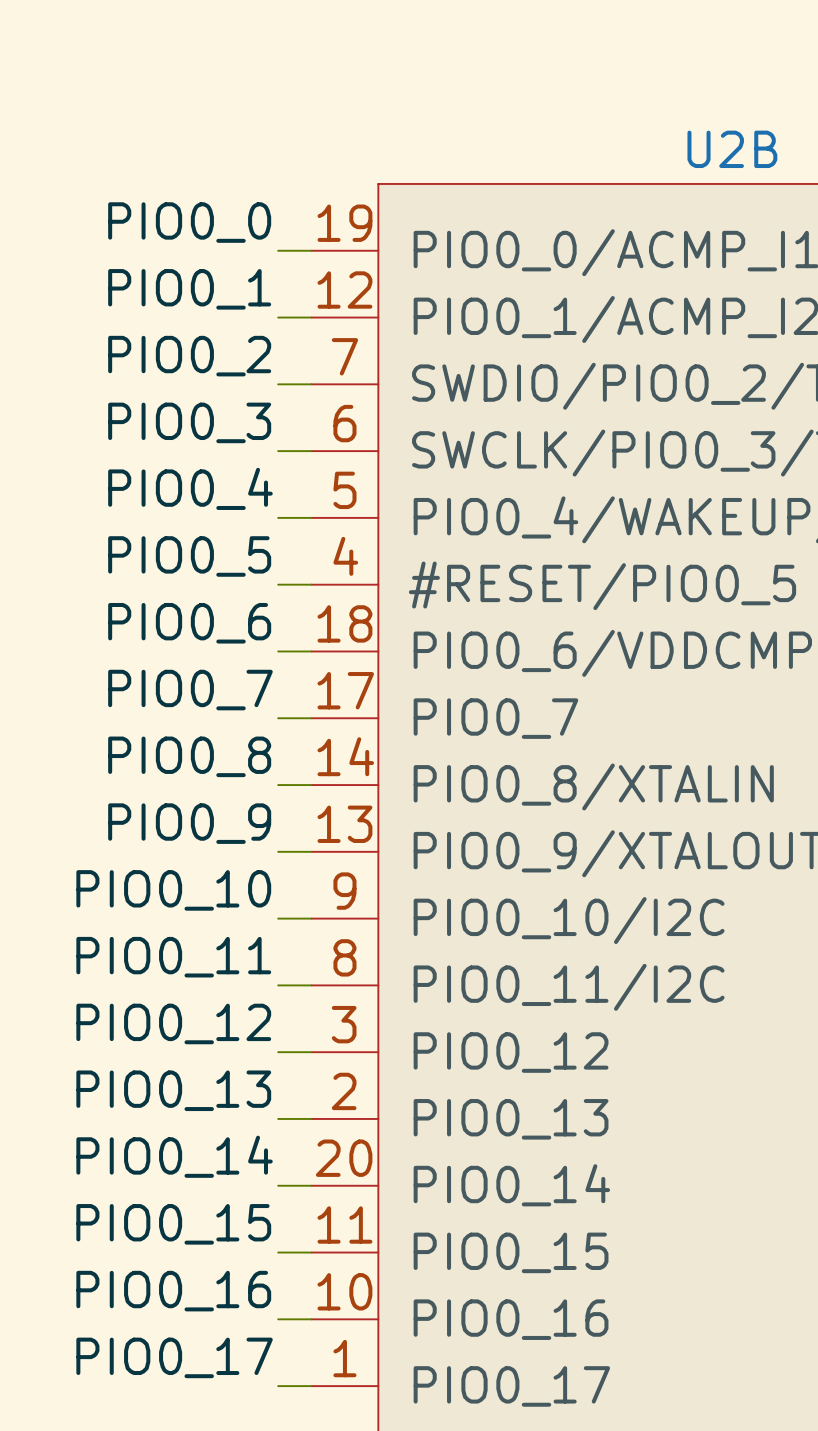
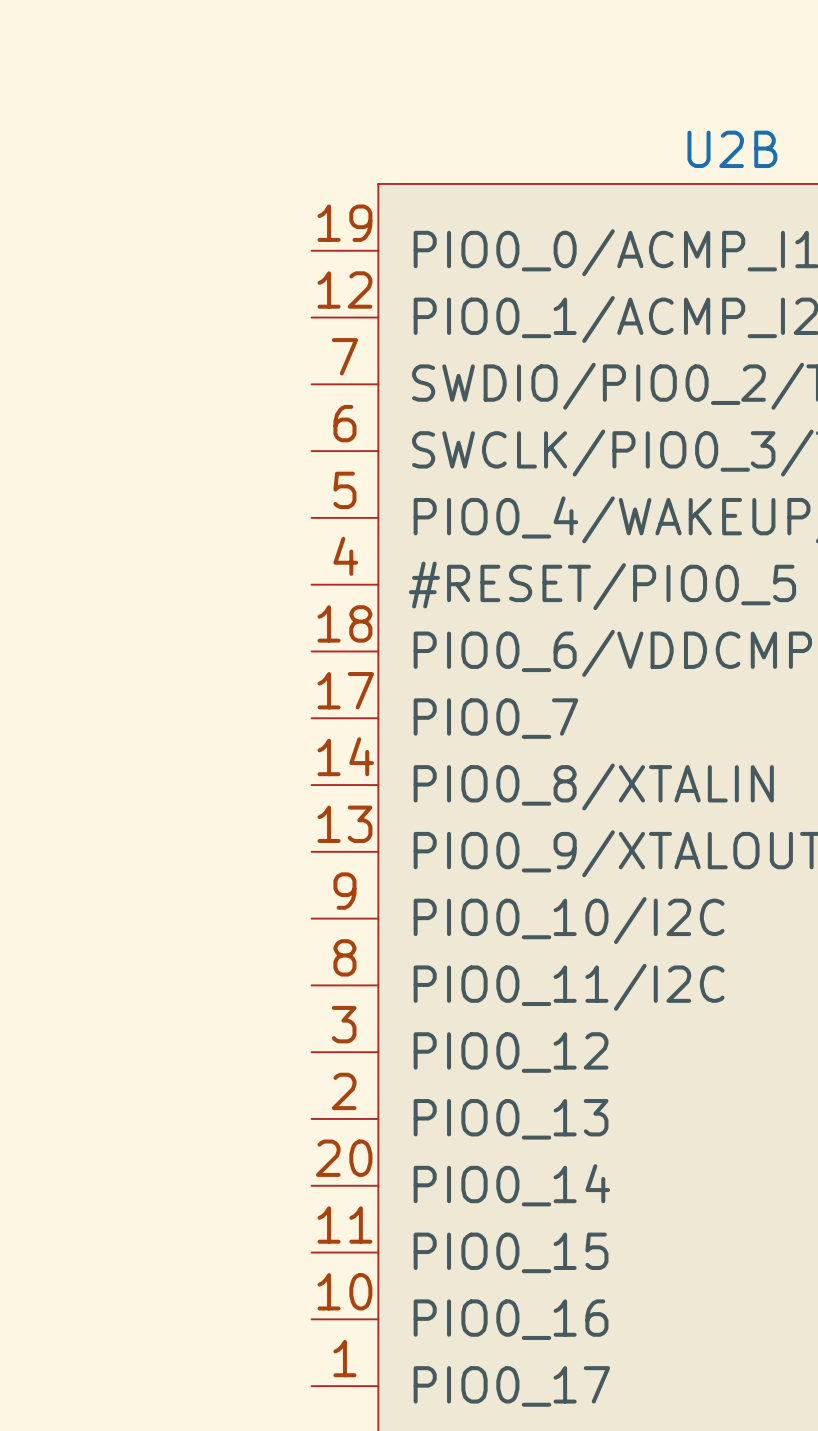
label: PIO0_0 (189, 222) -> none
wire: (278, 250) (311, 250) -> none
label: PIO0_1 (189, 289) -> none
wire: (278, 317) (311, 317) -> none
label: PIO0_2 (189, 356) -> none
wire: (278, 384) (311, 384) -> none
label: PIO0_3 (189, 422) -> none
wire: (278, 451) (311, 451) -> none
label: PIO0_4 (190, 488) -> none
wire: (278, 517) (311, 517) -> none
label: PIO0_5 (189, 556) -> none
wire: (278, 584) (311, 584) -> none
label: PIO0_6 (189, 623) -> none
wire: (278, 651) (311, 651) -> none
label: PIO0_7 (190, 690) -> none
wire: (278, 718) (311, 718) -> none
label: PIO0_8 (189, 756) -> none
wire: (278, 785) (311, 785) -> none
label: PIO0_9 (189, 823) -> none
wire: (278, 851) (311, 851) -> none
label: PIO0_10 (173, 890) -> none
wire: (278, 918) (311, 918) -> none
label: PIO0_11 (173, 957) -> none
wire: (278, 985) (311, 985) -> none
label: PIO0_12 (173, 1023) -> none
wire: (278, 1052) (311, 1052) -> none
label: PIO0_13 (173, 1090) -> none
wire: (278, 1118) (311, 1118) -> none
label: PIO0_14 (174, 1156) -> none
wire: (278, 1185) (311, 1185) -> none
label: PIO0_15 (173, 1224) -> none
wire: (278, 1252) (311, 1252) -> none
label: PIO0_16 (173, 1291) -> none
wire: (278, 1319) (311, 1319) -> none
label: PIO0_17 (174, 1357) -> none
wire: (278, 1386) (311, 1386) -> none

